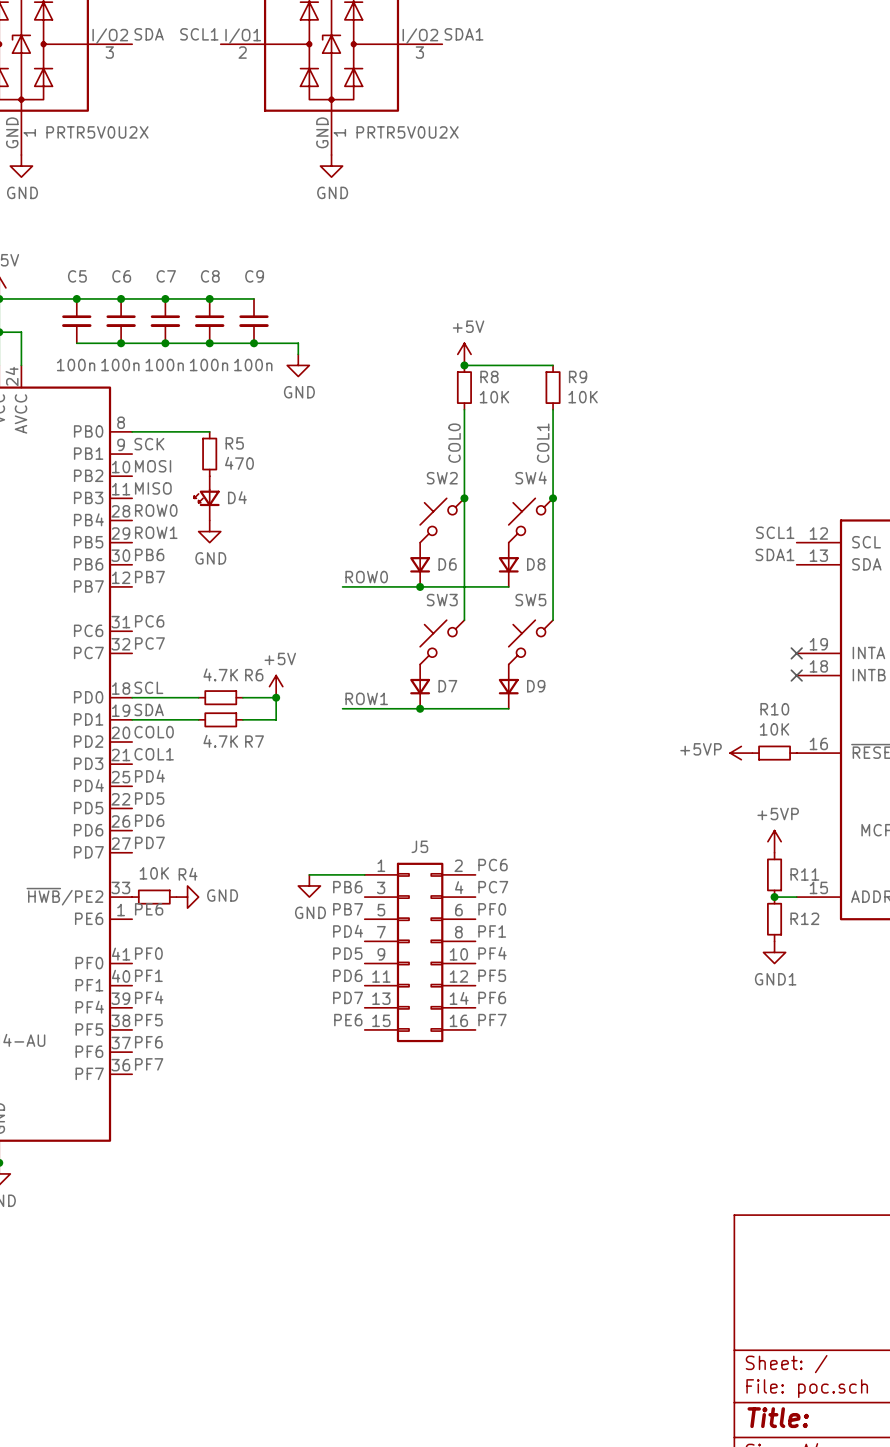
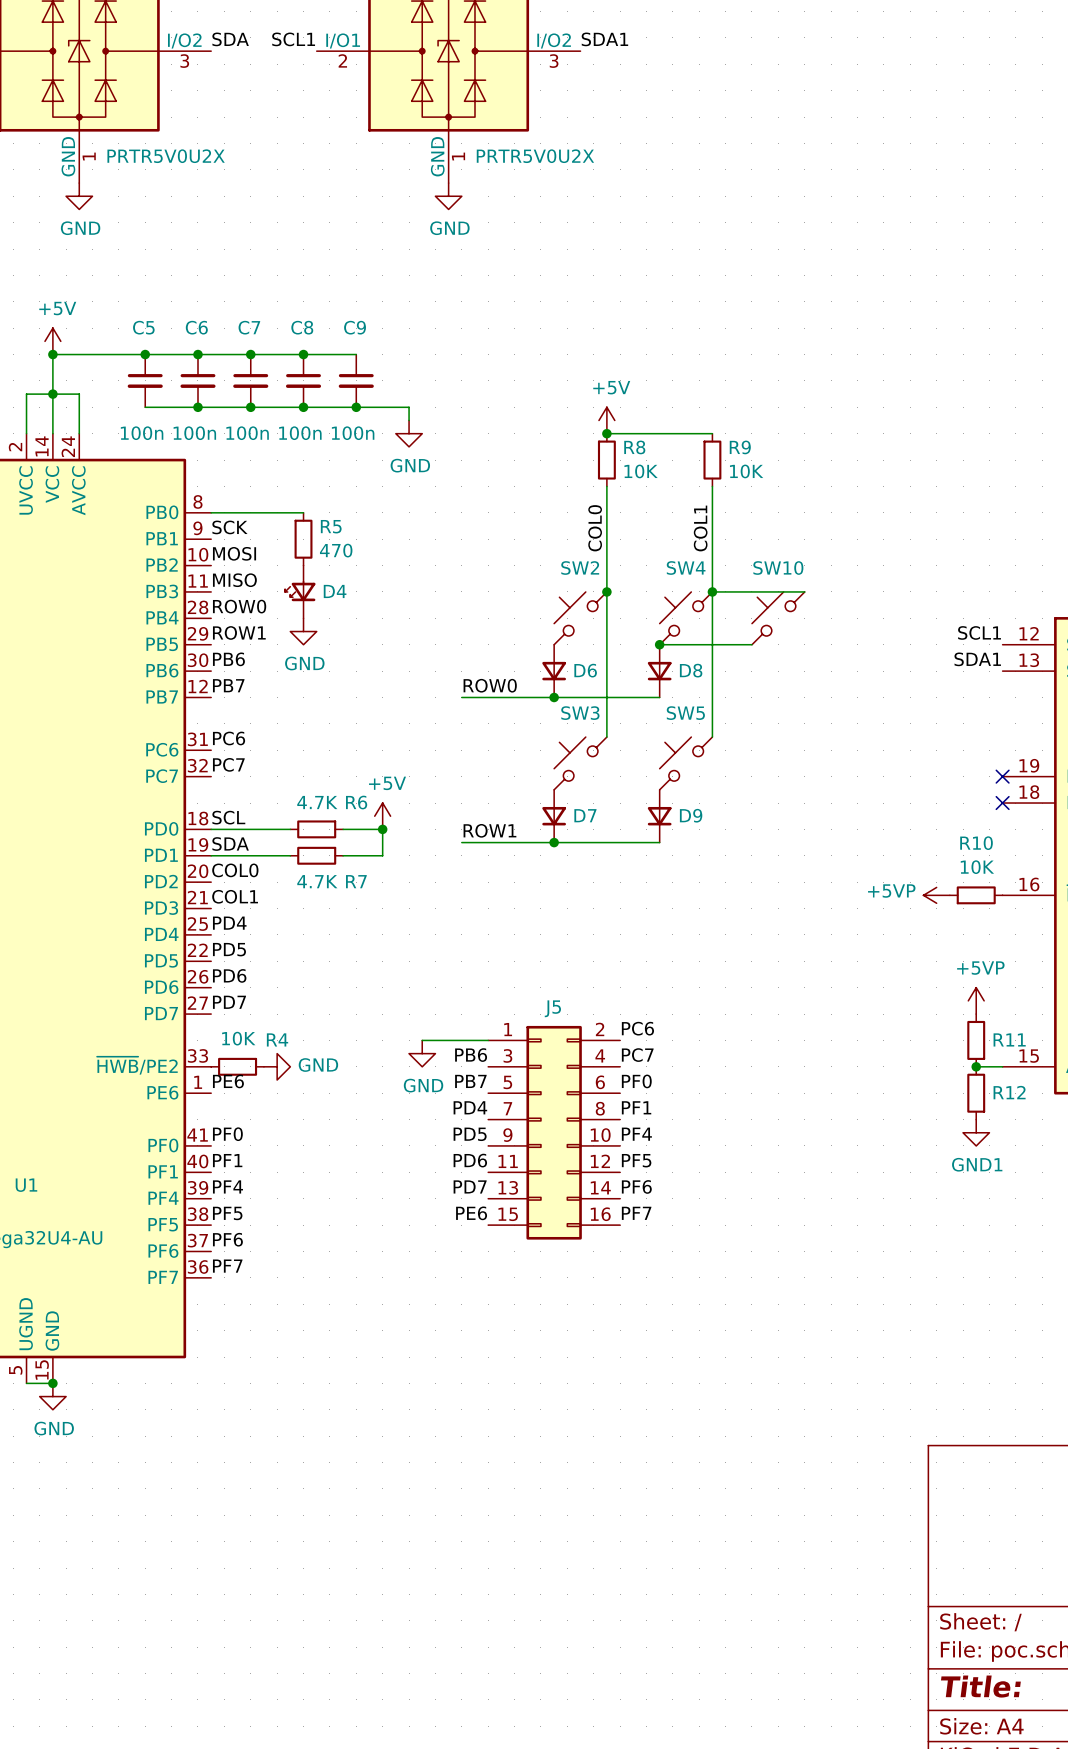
wire: none -> (712, 591) (804, 591)
SW10: none -> (778, 618)
wire: none -> (659, 644) (751, 644)
junction: none -> (659, 644)

